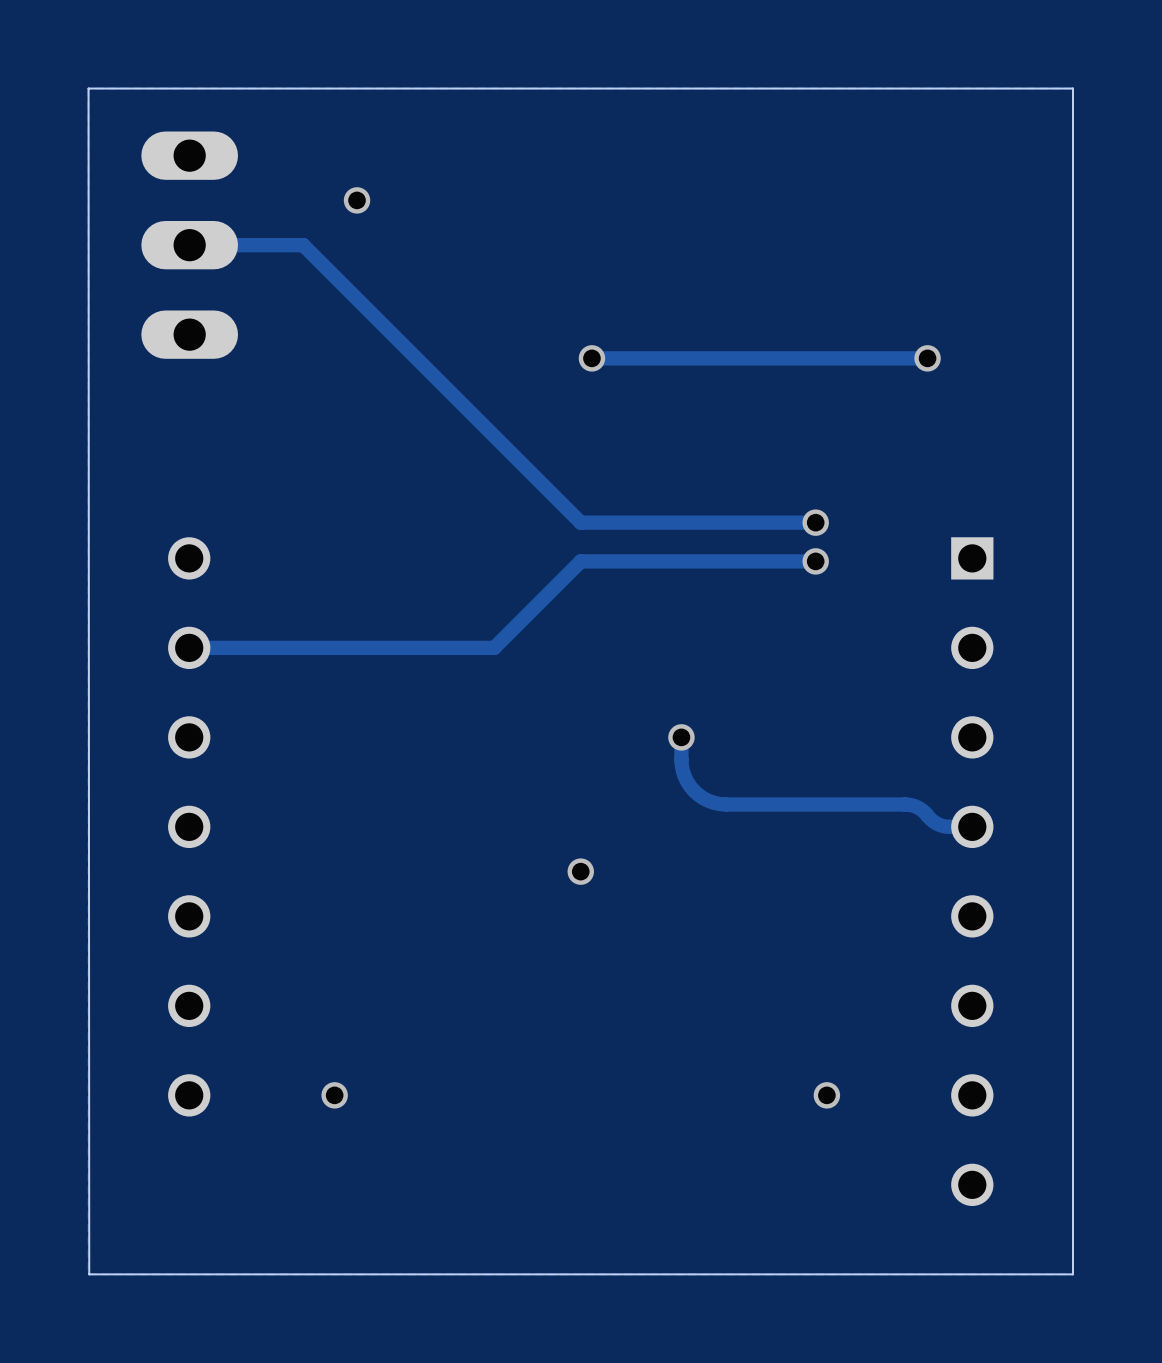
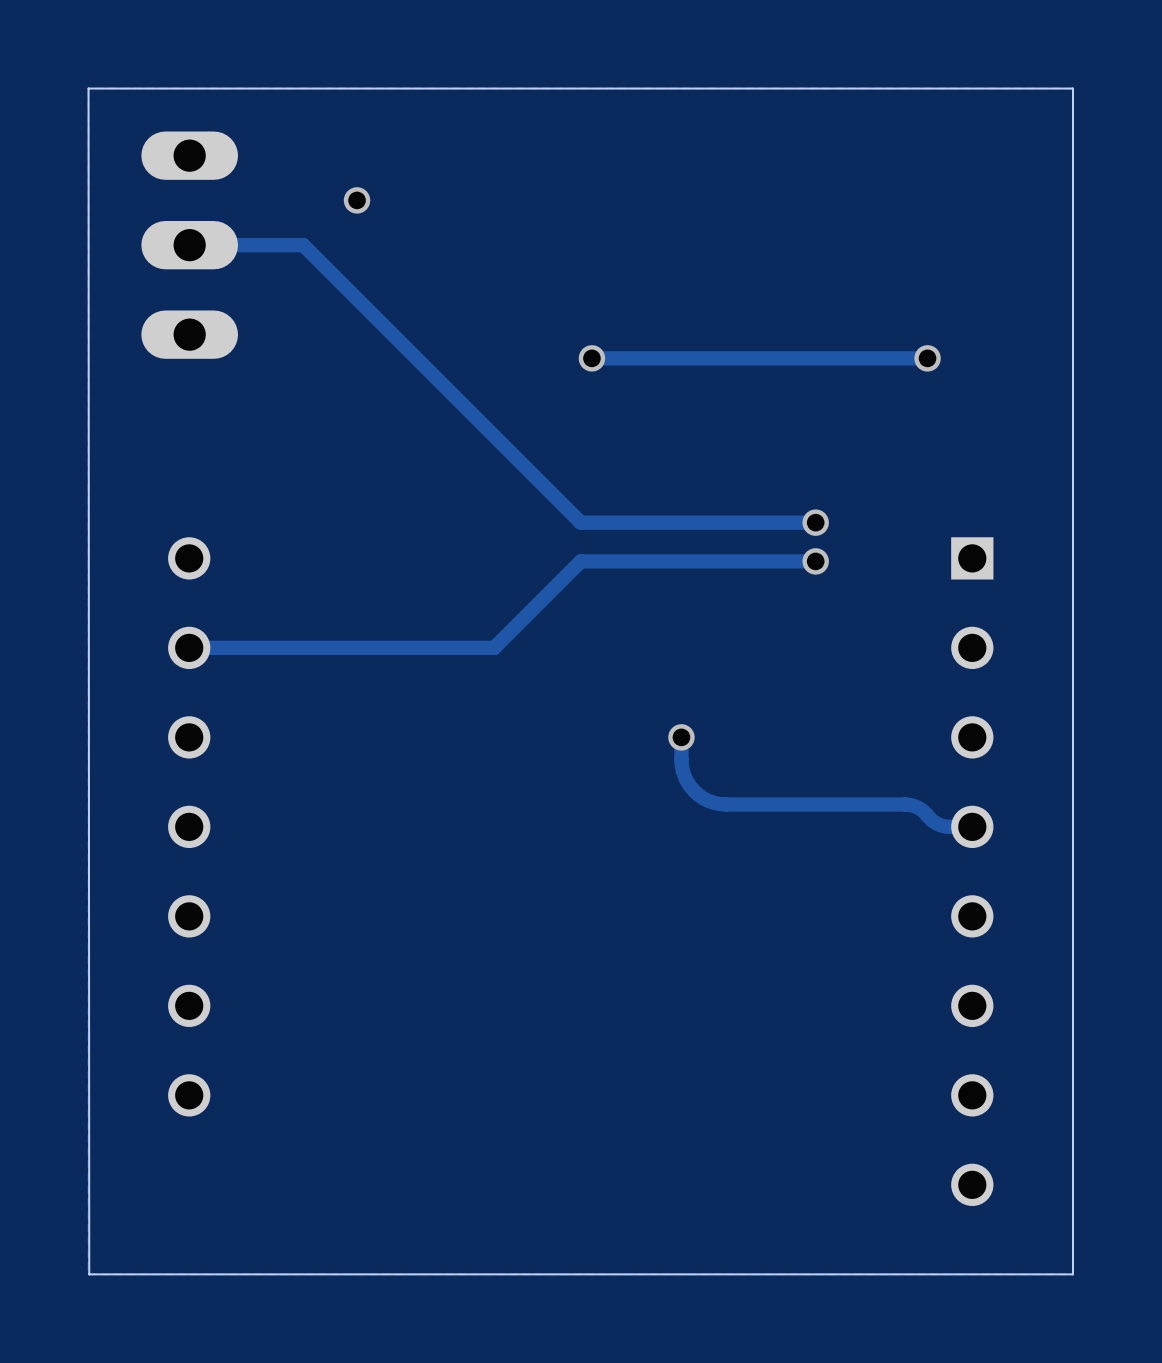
via: (580, 871) -> none
via: (334, 1095) -> none
via: (826, 1095) -> none

